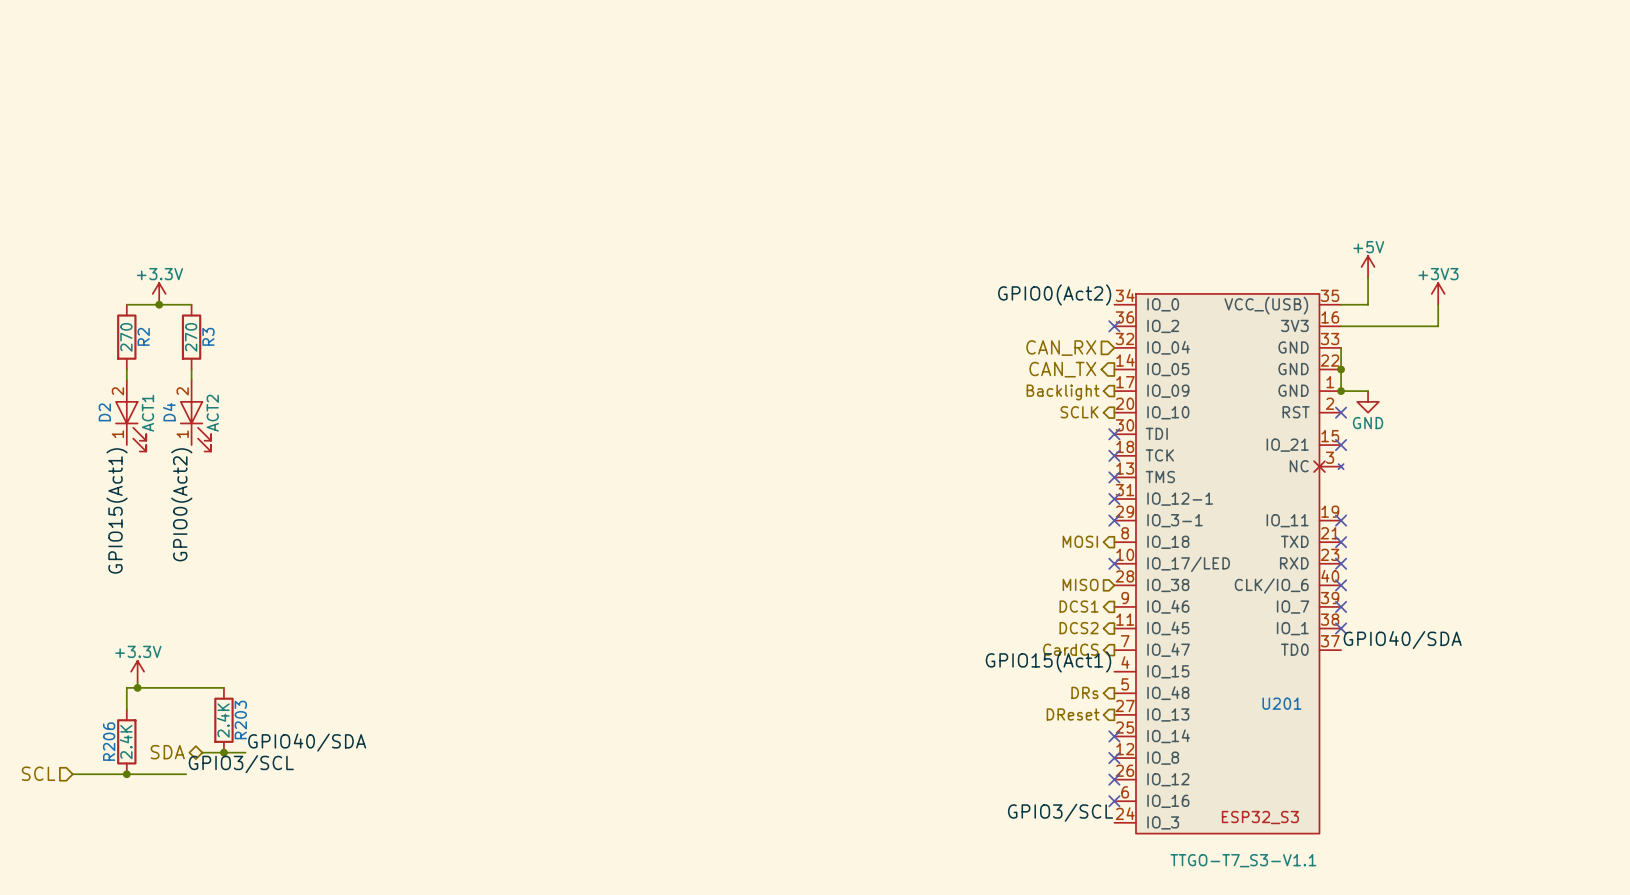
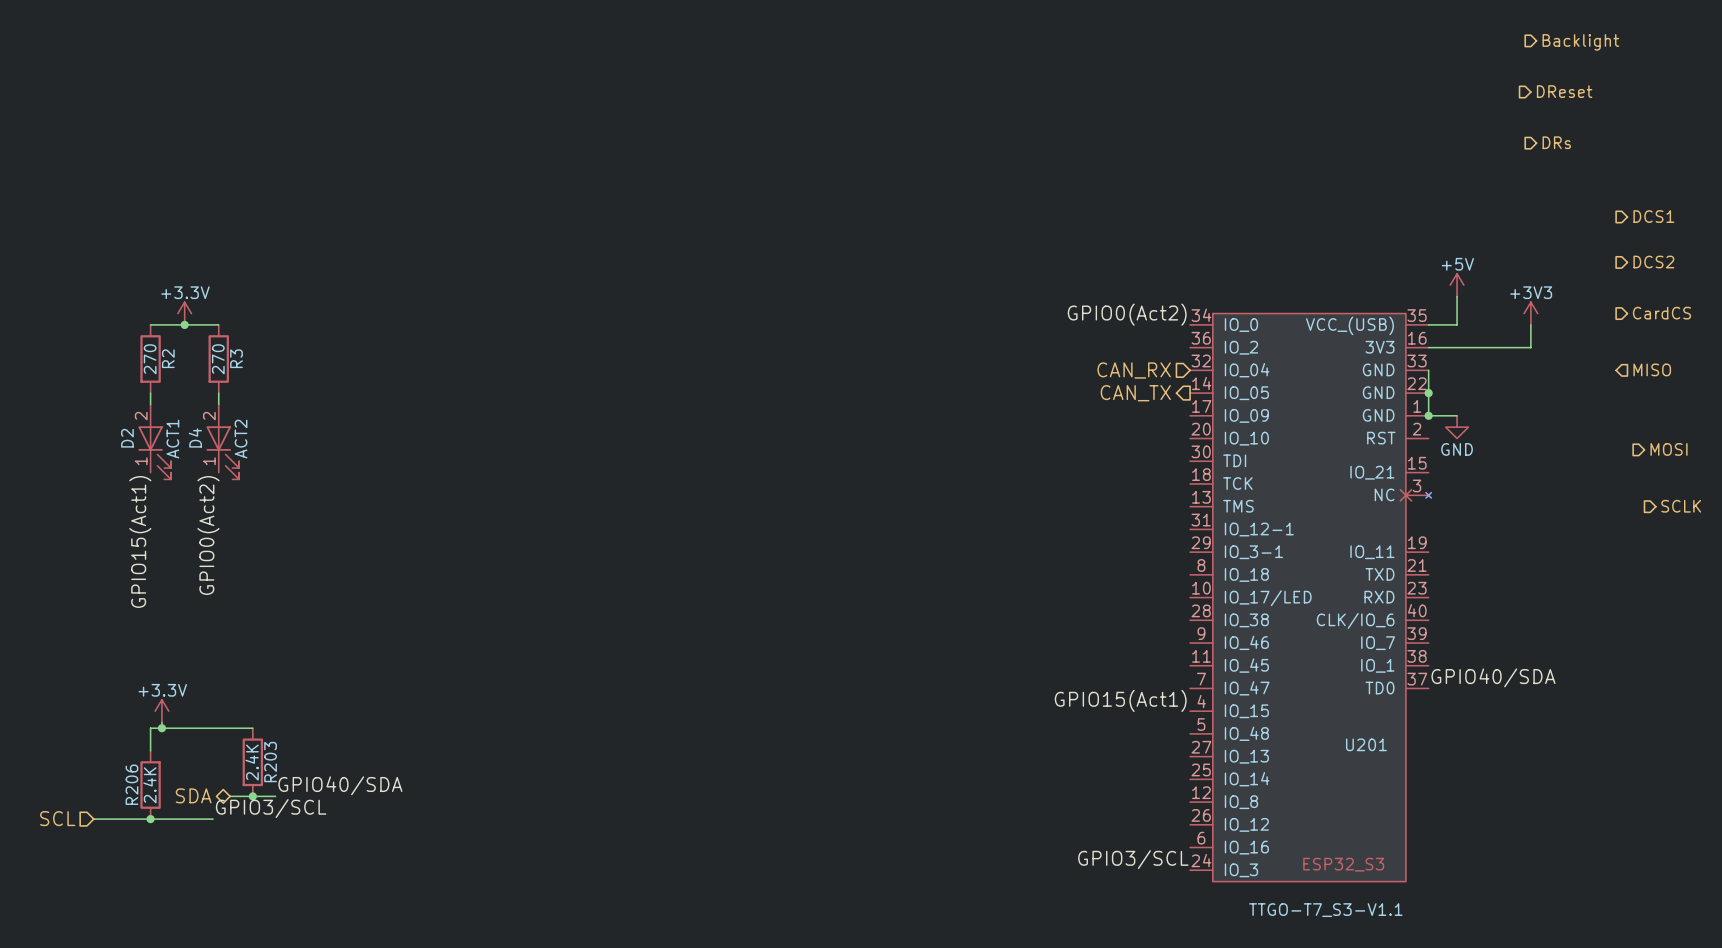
hierarchical label: none -> Backlight (1580, 42)
hierarchical label: none -> DReset (1564, 91)
hierarchical label: none -> DRs (1556, 142)
hierarchical label: none -> DCS1 (1653, 216)
hierarchical label: none -> DCS2 (1653, 262)
hierarchical label: none -> CardCS (1661, 313)
no-connect mark: (1114, 326) -> none
hierarchical label: none -> MISO (1652, 369)
hierarchical label: Backlight (1063, 392) -> none
hierarchical label: SCLK (1079, 412) -> none
no-connect mark: (1341, 412) -> none
hierarchical label: none -> MOSI (1669, 449)
no-connect mark: (1114, 434) -> none
no-connect mark: (1341, 445) -> none
no-connect mark: (1114, 455) -> none
no-connect mark: (1114, 477) -> none
hierarchical label: none -> SCLK (1681, 506)
no-connect mark: (1114, 499) -> none
no-connect mark: (1114, 520) -> none
no-connect mark: (1341, 520) -> none
hierarchical label: MOSI (1080, 541) -> none
no-connect mark: (1341, 542) -> none
no-connect mark: (1114, 563) -> none
no-connect mark: (1341, 563) -> none
hierarchical label: MISO (1080, 584) -> none
no-connect mark: (1341, 585) -> none
hierarchical label: DCS1 (1079, 606) -> none
no-connect mark: (1341, 606) -> none
hierarchical label: DCS2 (1079, 628) -> none
no-connect mark: (1341, 628) -> none
hierarchical label: CardCS (1070, 649) -> none
hierarchical label: DRs (1084, 692) -> none
hierarchical label: DReset (1073, 714) -> none
no-connect mark: (1114, 736) -> none
no-connect mark: (1114, 758) -> none
no-connect mark: (1114, 779) -> none
no-connect mark: (1114, 801) -> none

